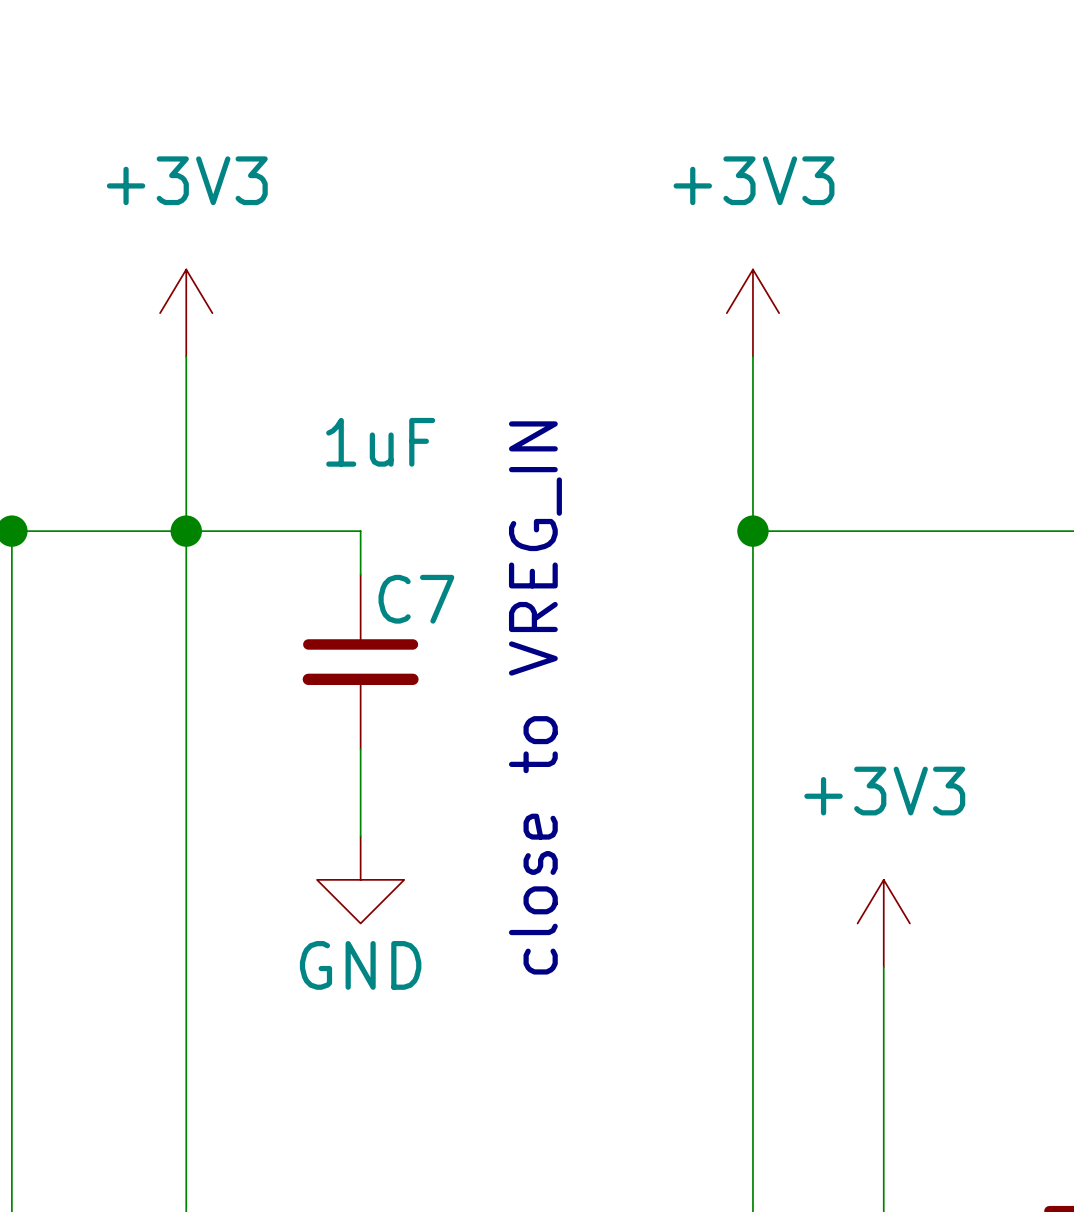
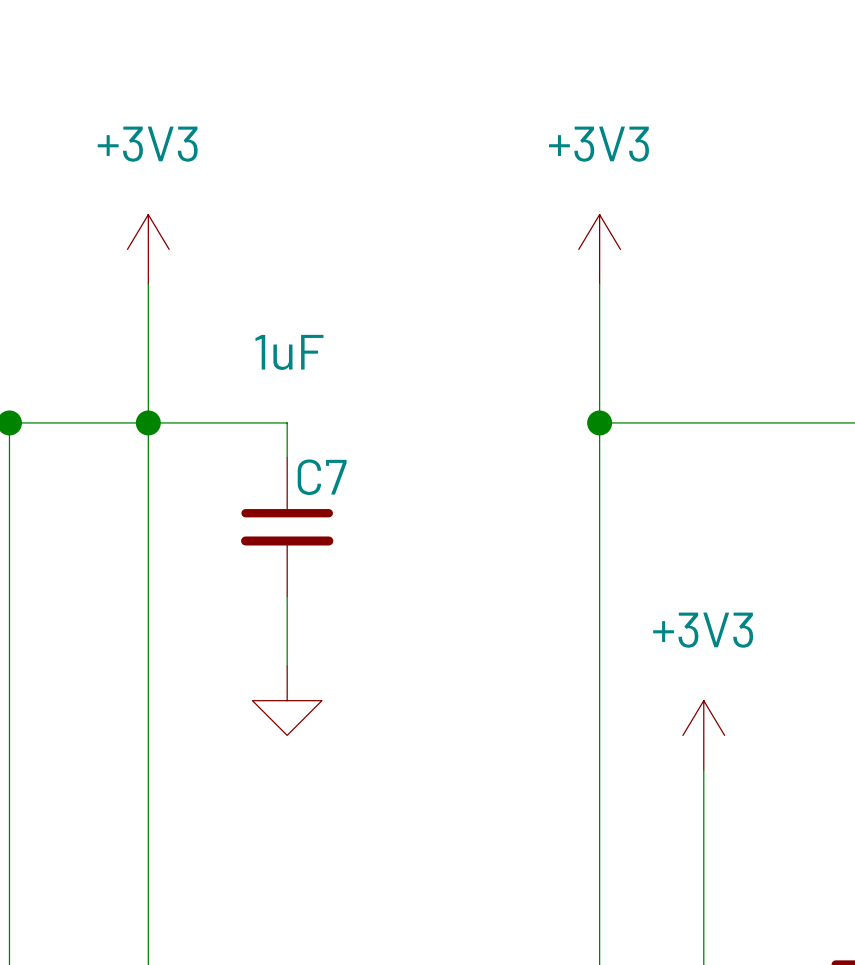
text: close to VREG_IN (535, 697) -> none
power symbol text: GND (360, 965) -> none

